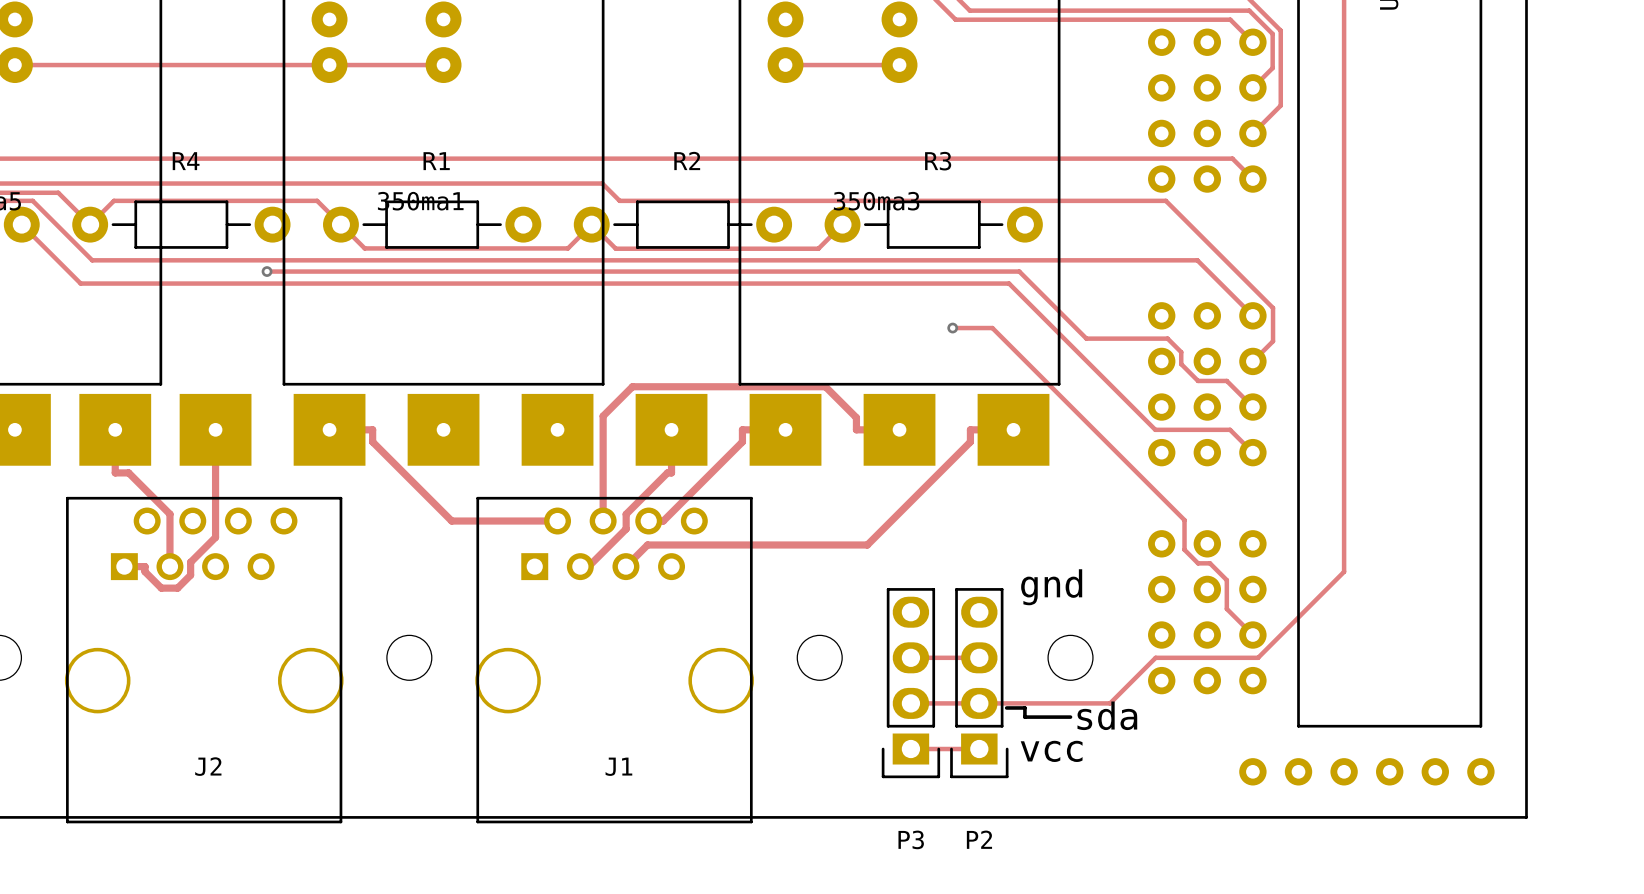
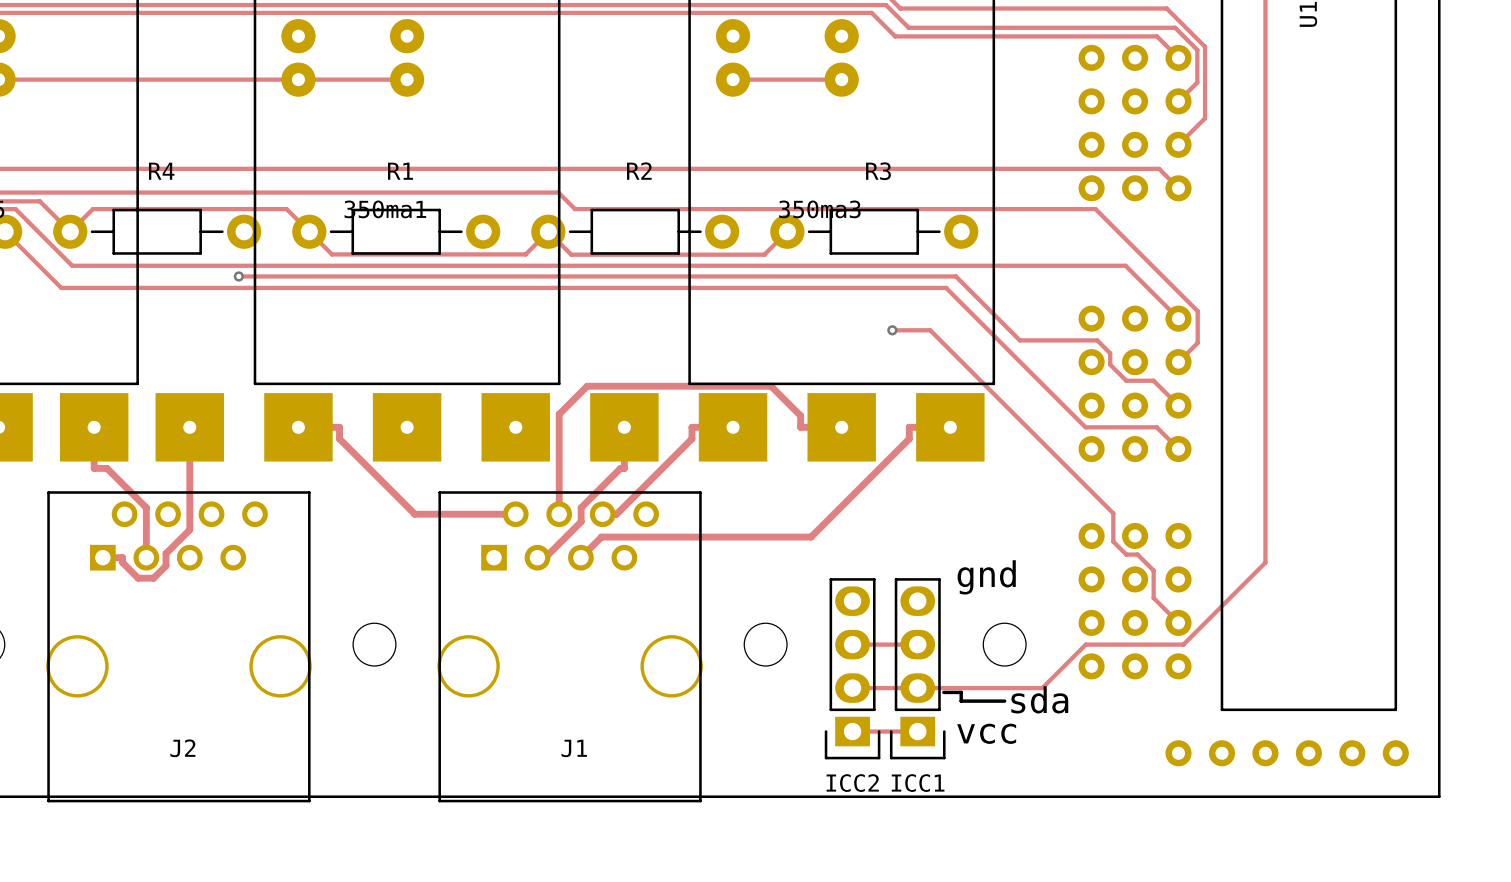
P3 name: P3 (911, 839) -> ICC2 (852, 783)
P2 name: P2 (979, 839) -> ICC1 (918, 783)

